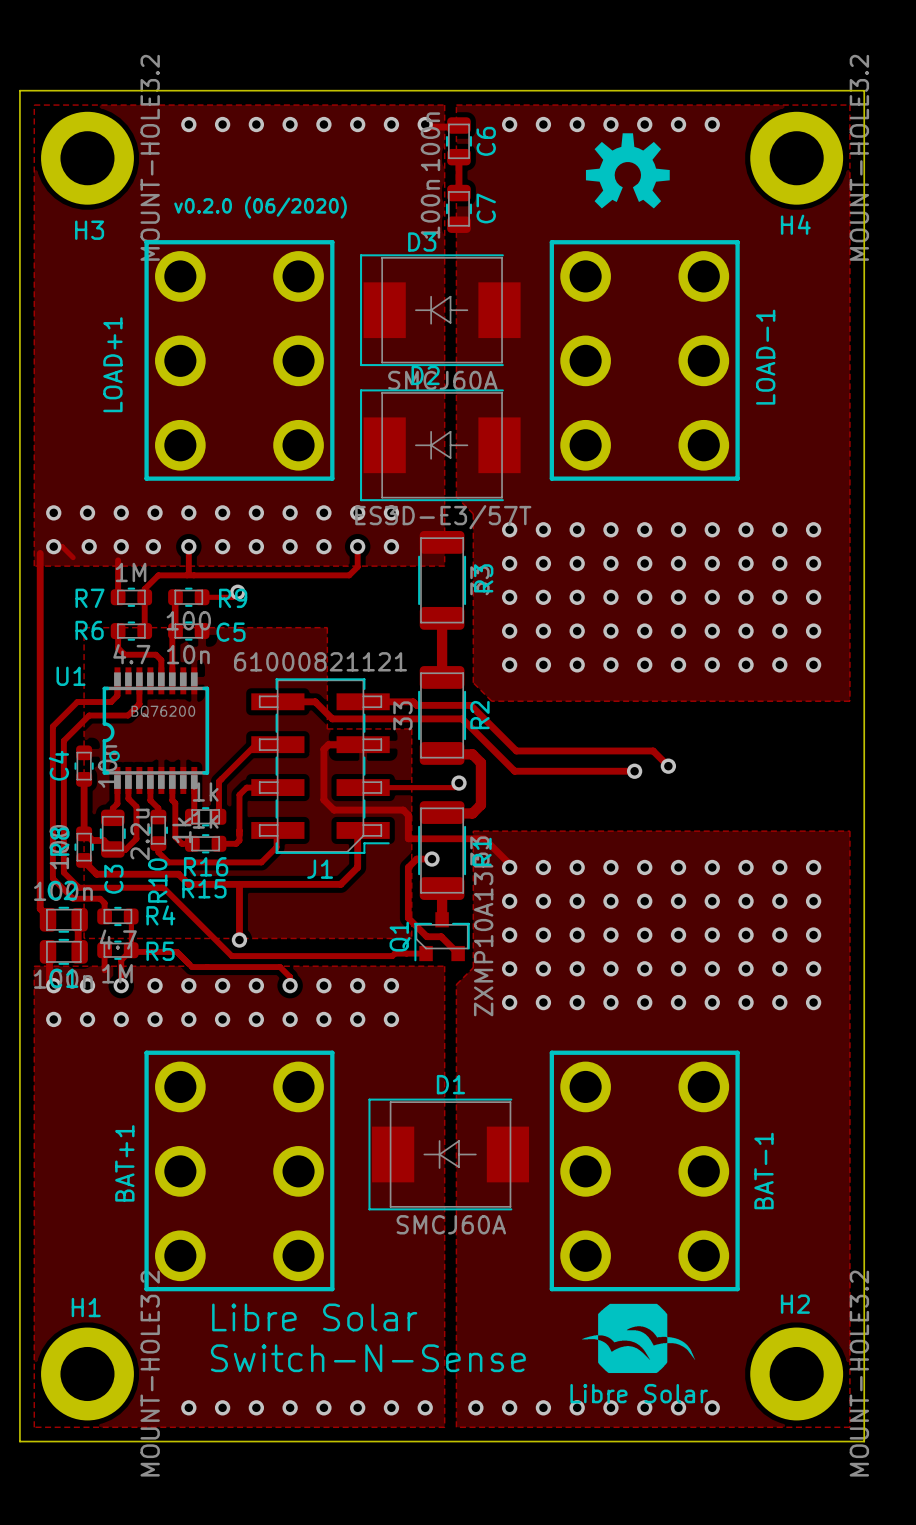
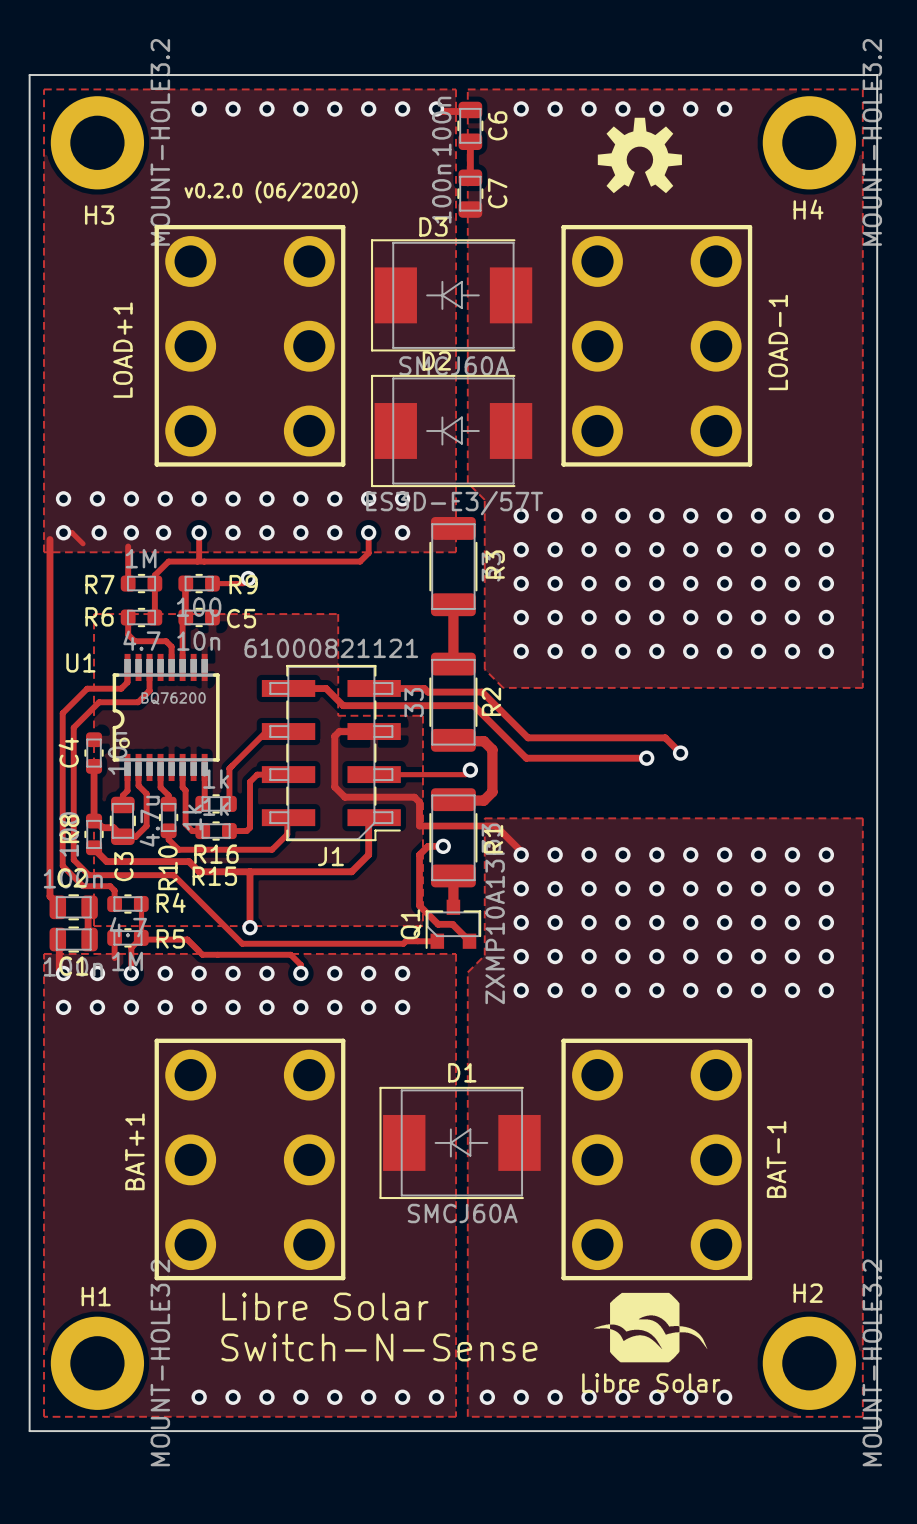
C3 value: 2.2u (140, 834) -> 4.7u (149, 821)

